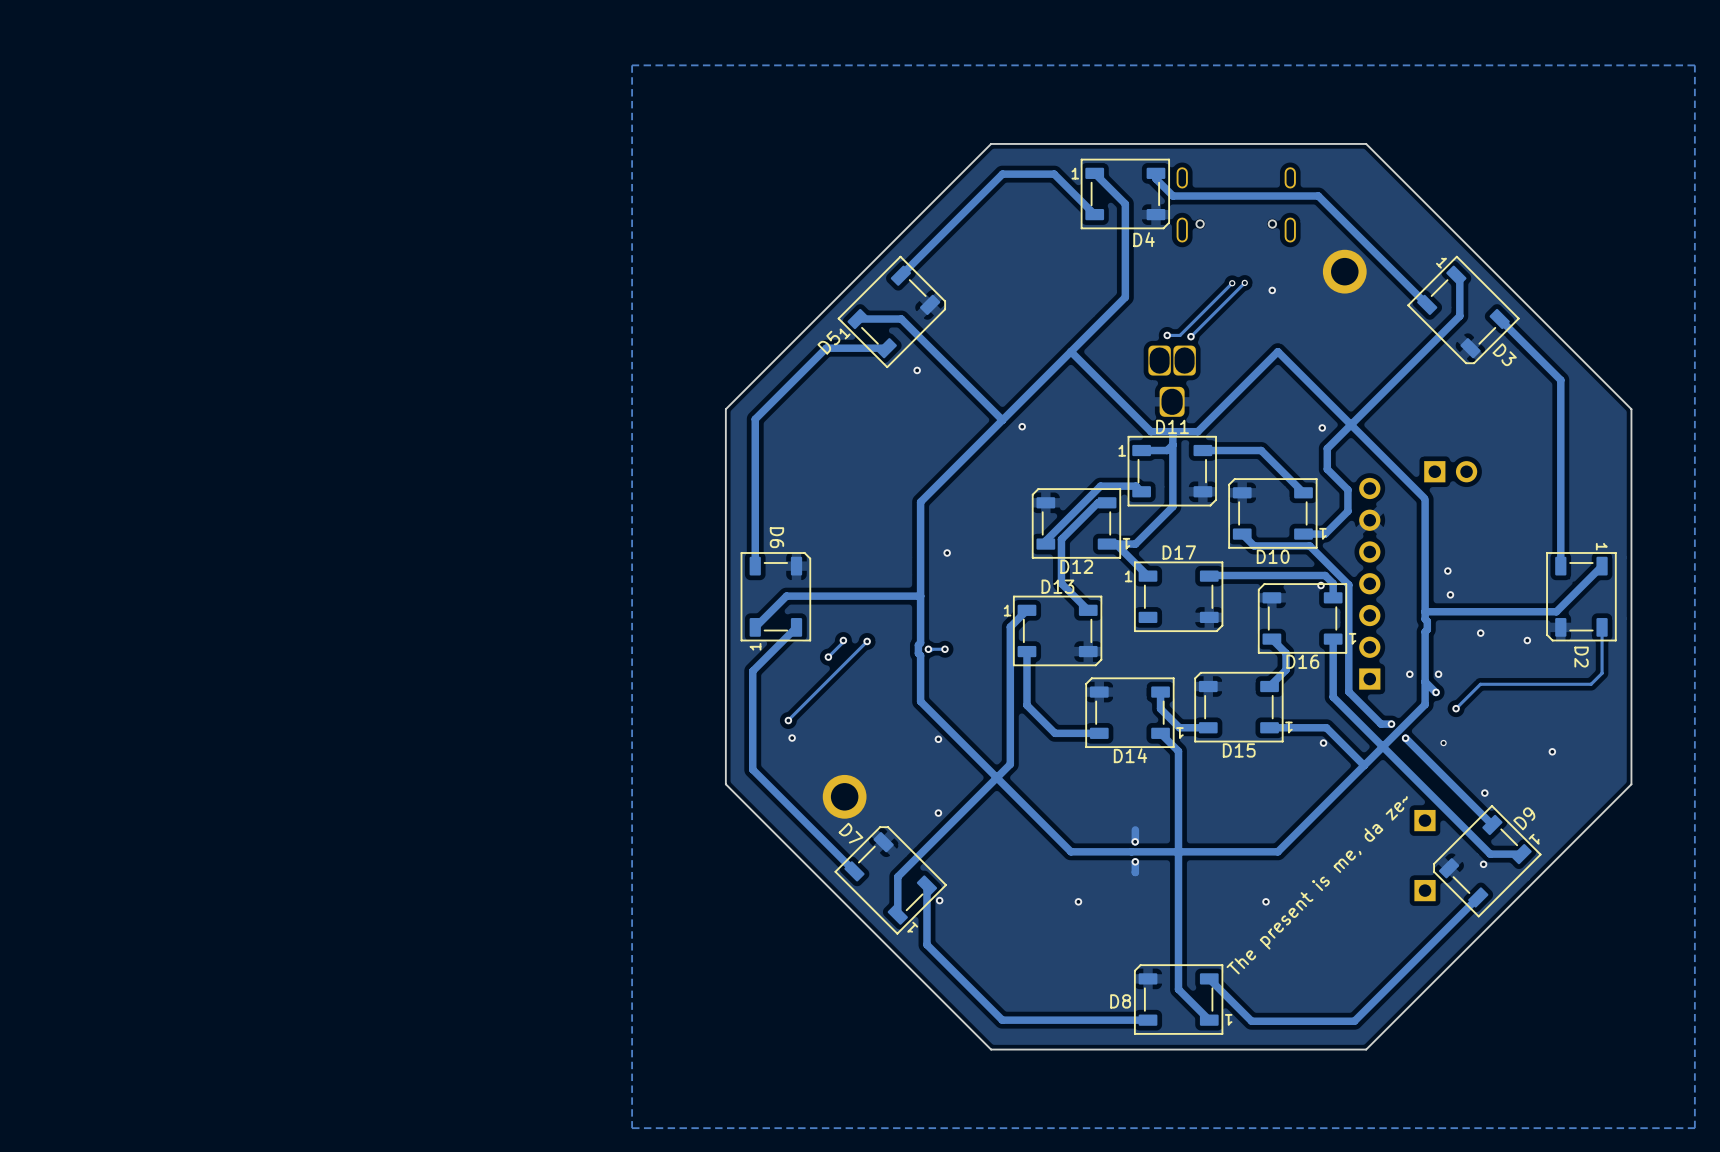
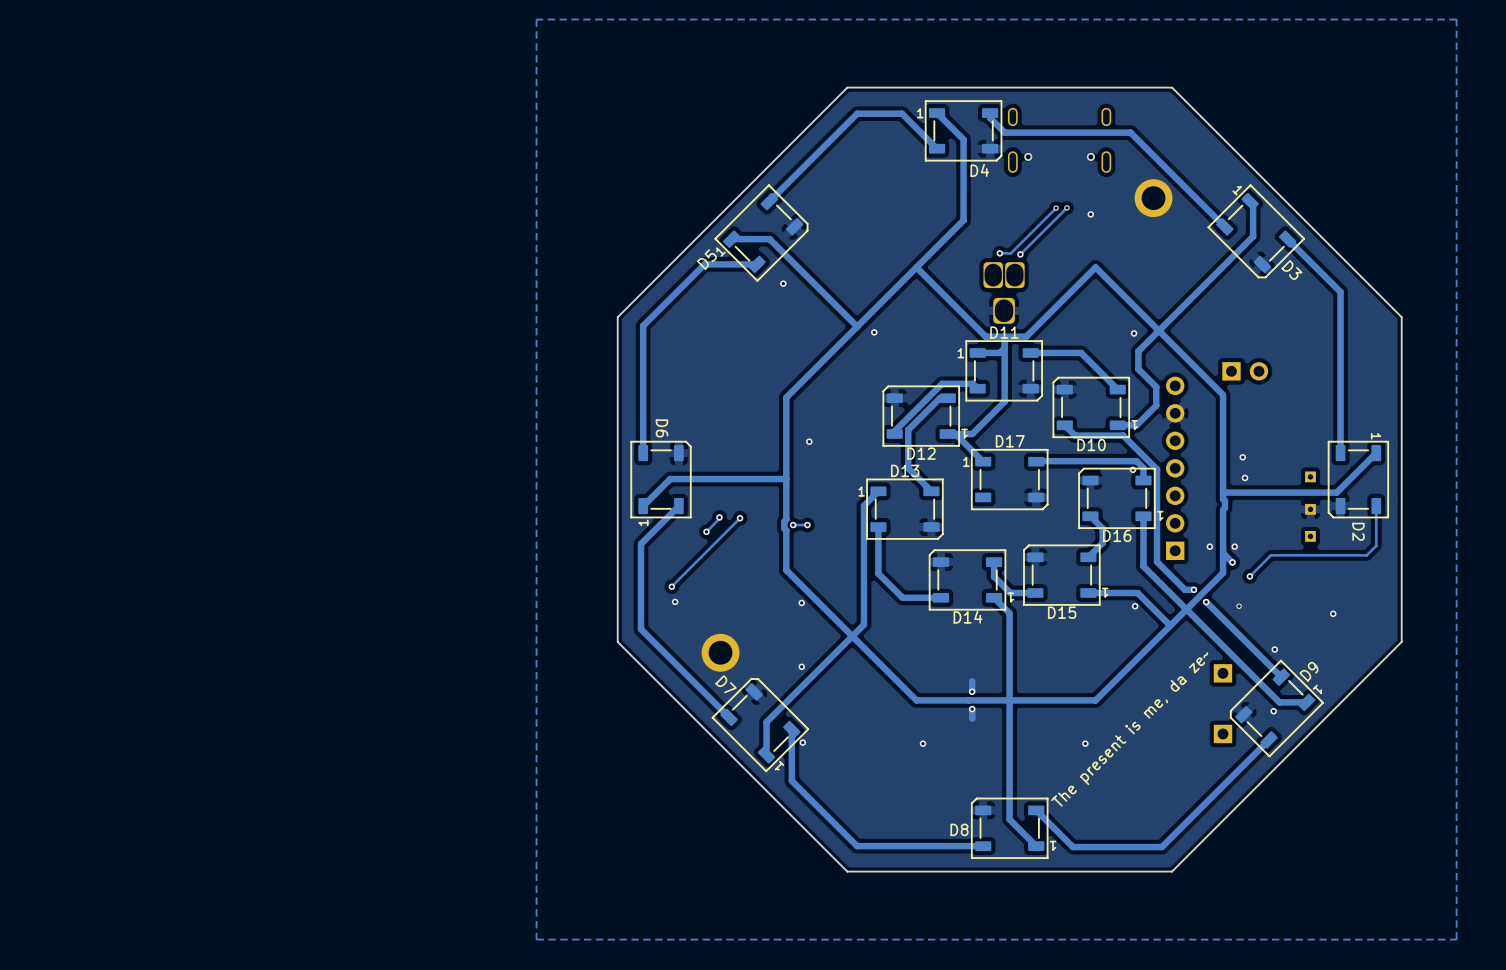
part: none -> (1310, 476)
part: none -> (1310, 509)
via: (1480, 633) -> none
via: (1527, 640) -> none
part: none -> (1310, 536)

